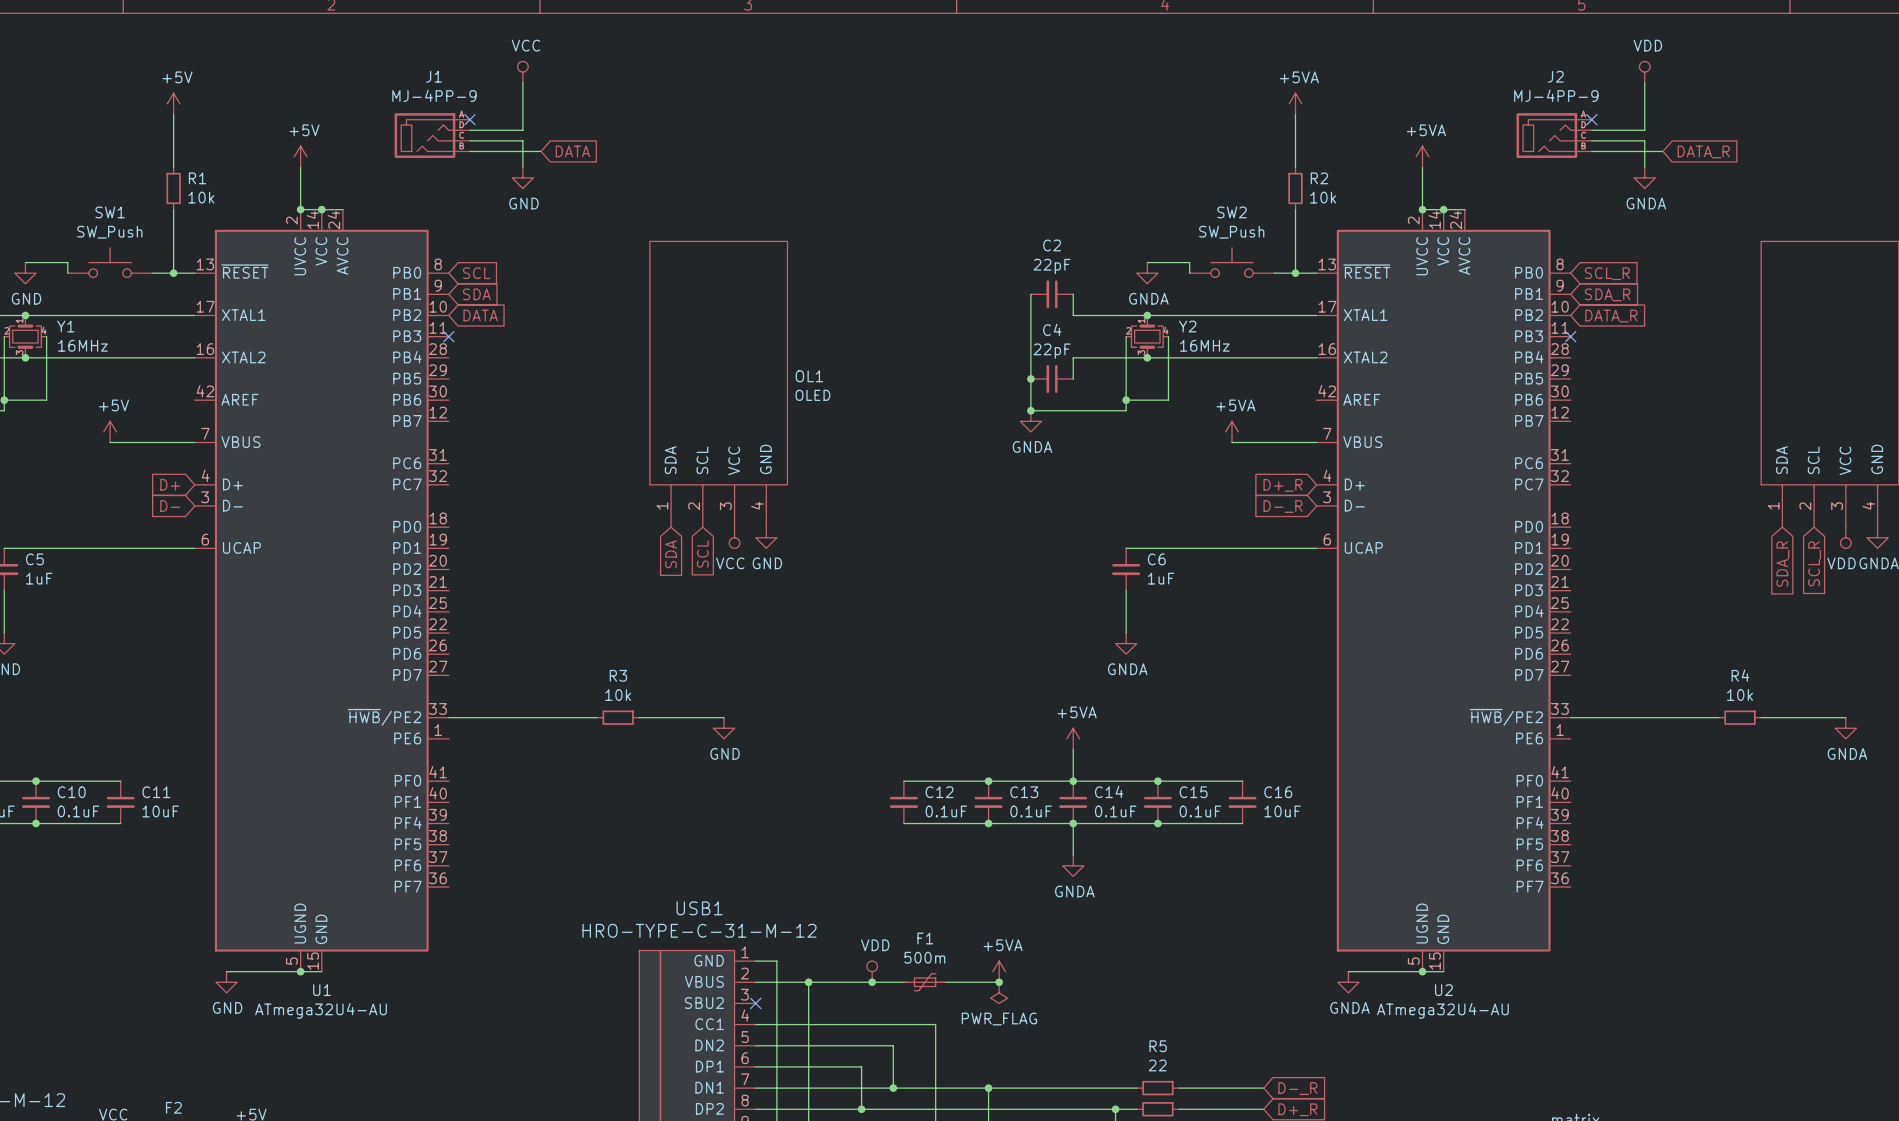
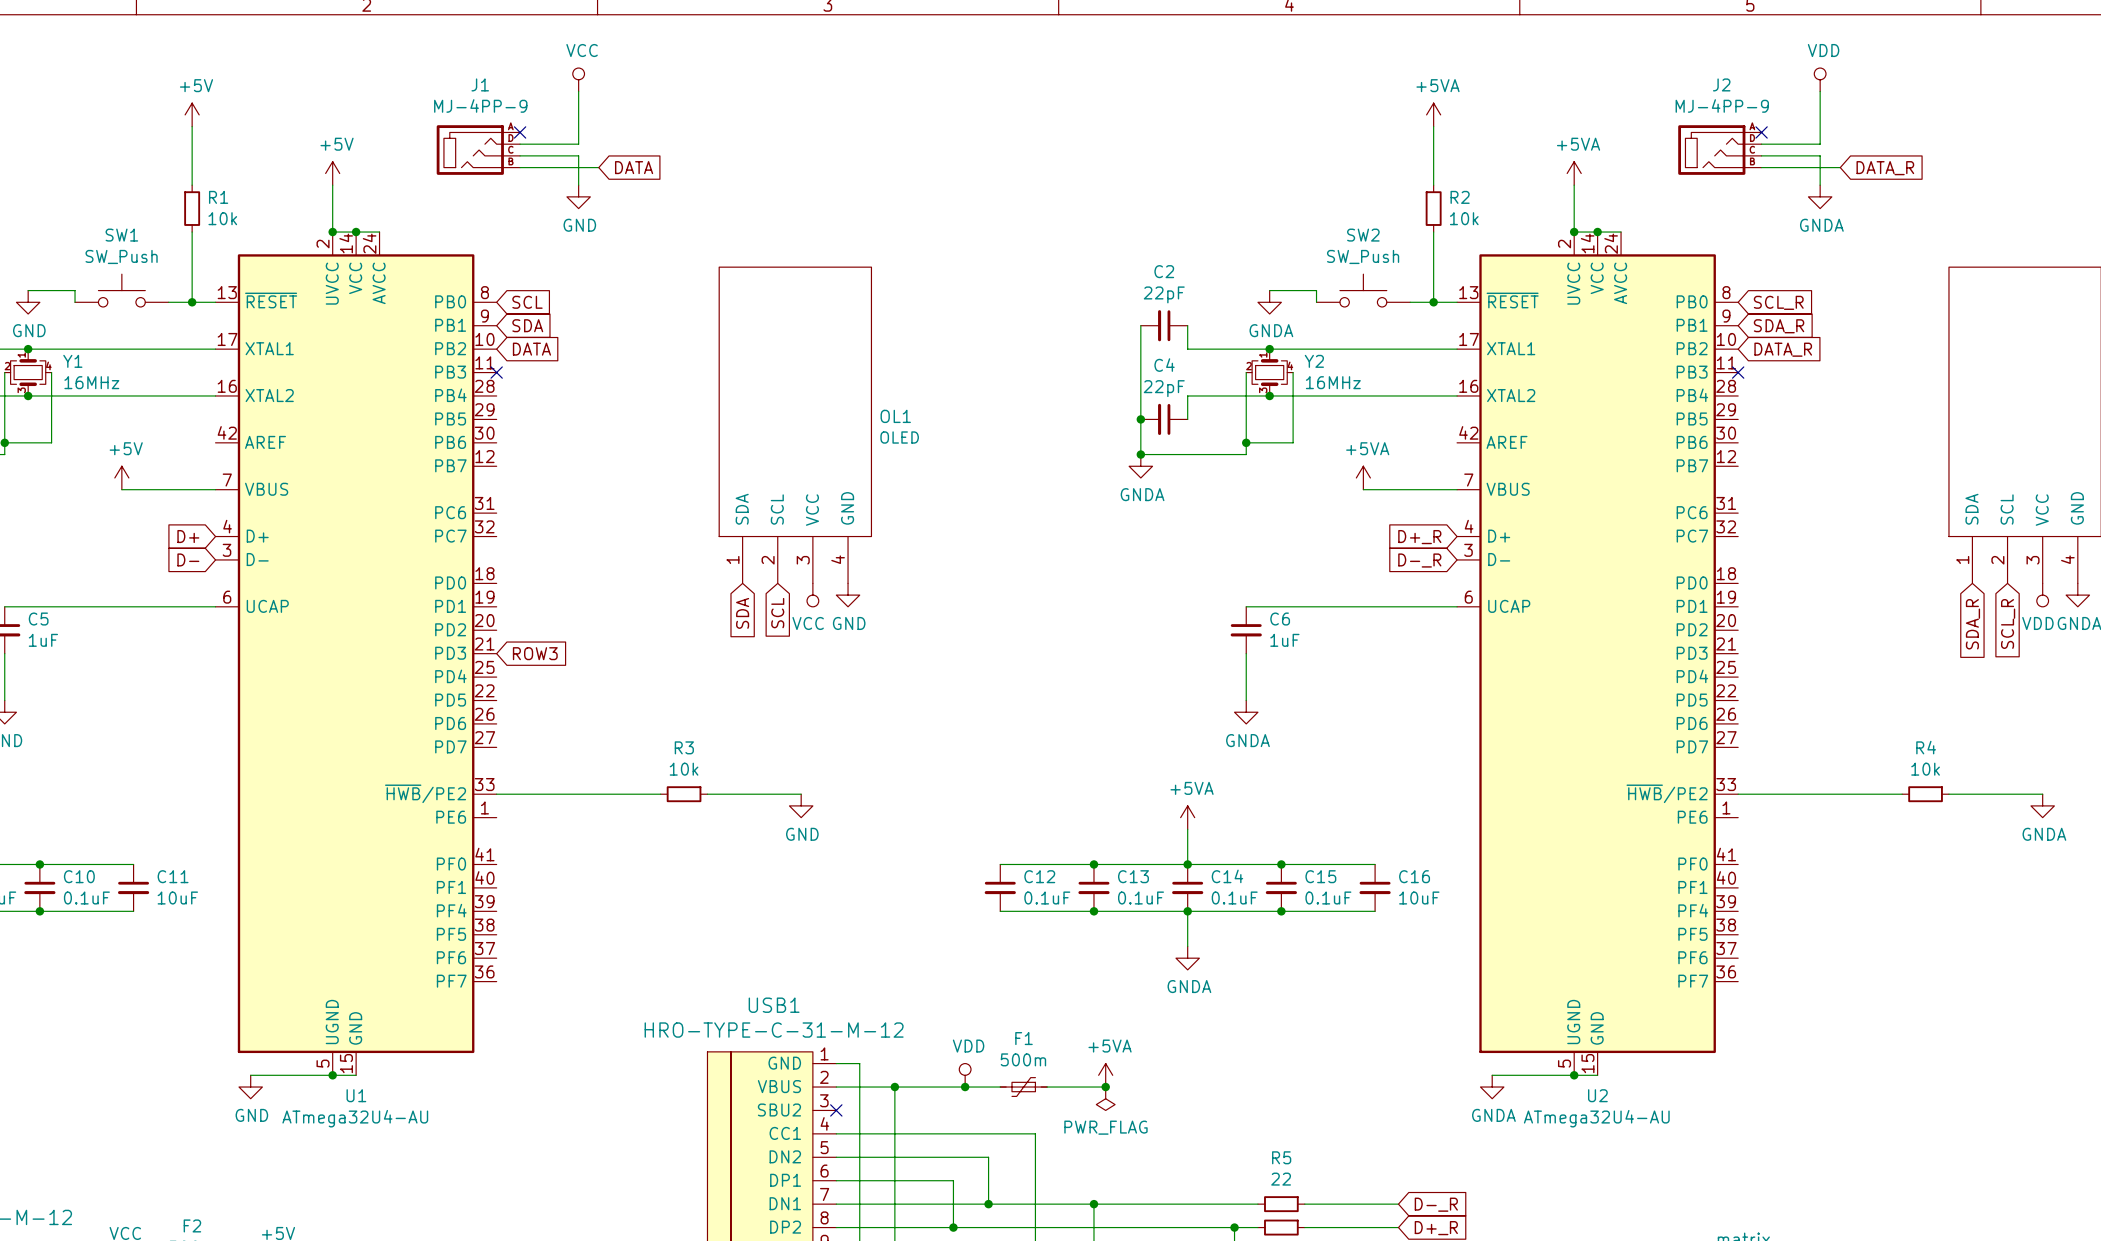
global label: none -> ROW3 (535, 653)

